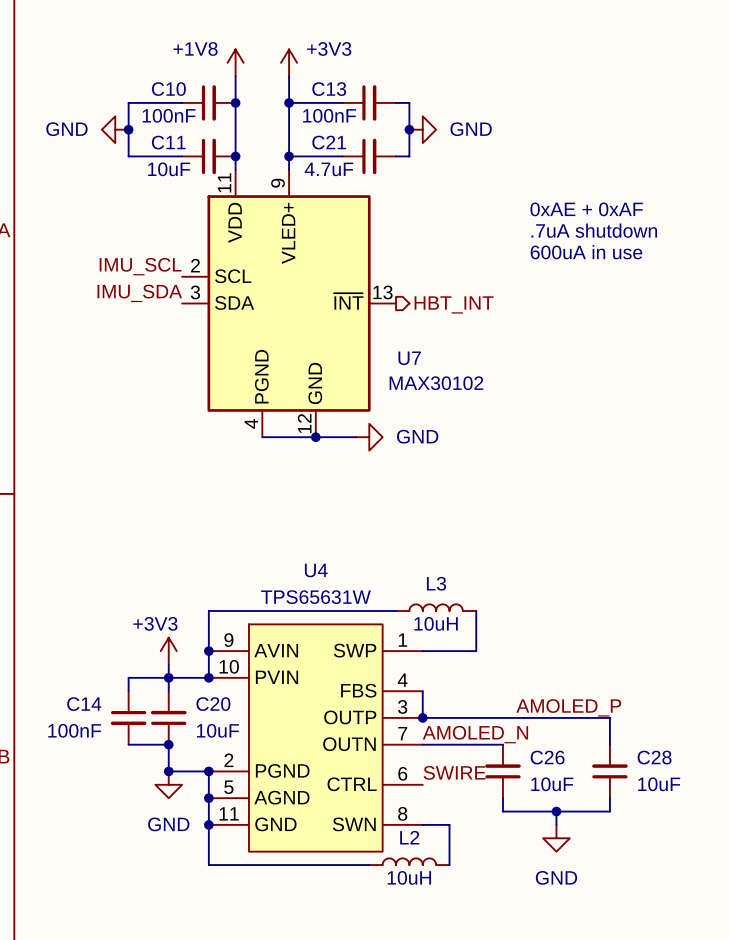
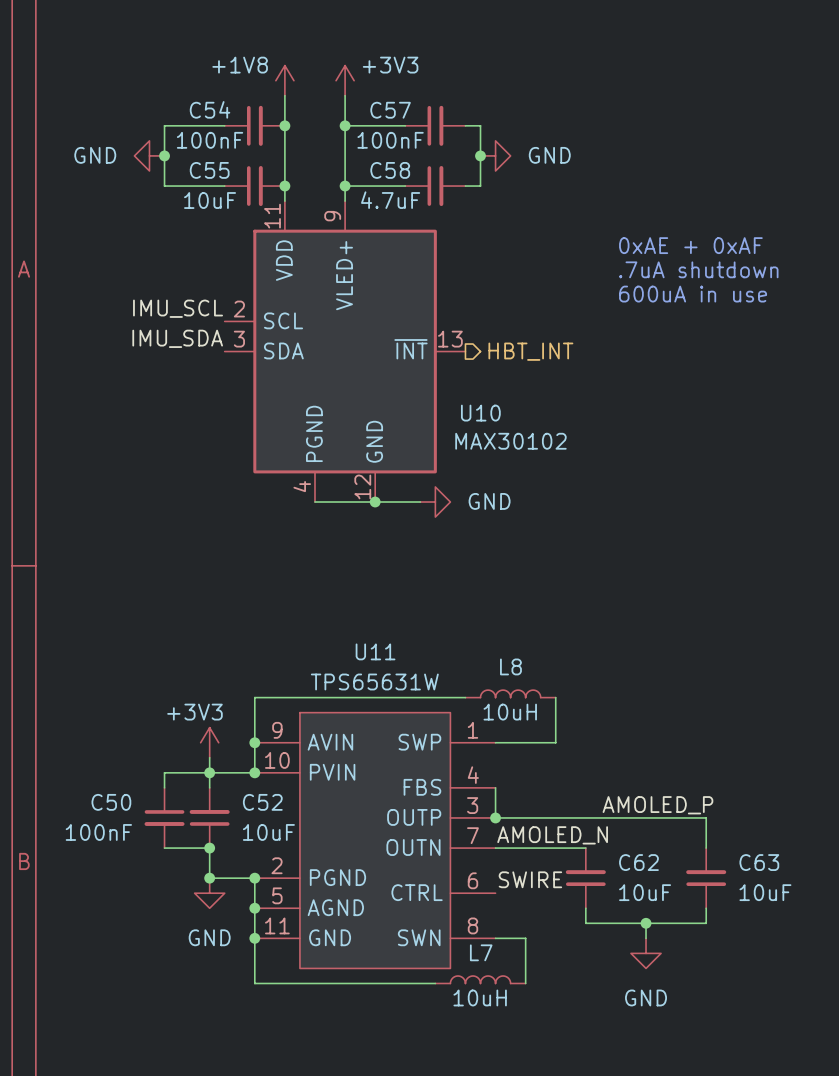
C10 name: C10 (168, 89) -> C54 (210, 109)
C13 name: C13 (329, 89) -> C57 (390, 110)
C11 name: C11 (168, 142) -> C55 (209, 170)
C21 name: C21 (329, 142) -> C58 (390, 170)
U7 name: U7 (409, 358) -> U10 (480, 413)
U4 name: U4 (316, 570) -> U11 (375, 651)
L3 name: L3 (436, 583) -> L8 (510, 666)
C14 name: C14 (84, 704) -> C50 (111, 802)
C20 name: C20 (213, 704) -> C52 (262, 802)
C26 name: C26 (547, 757) -> C62 (638, 862)
C28 name: C28 (654, 757) -> C63 (759, 862)
L2 name: L2 (409, 837) -> L7 (481, 952)

